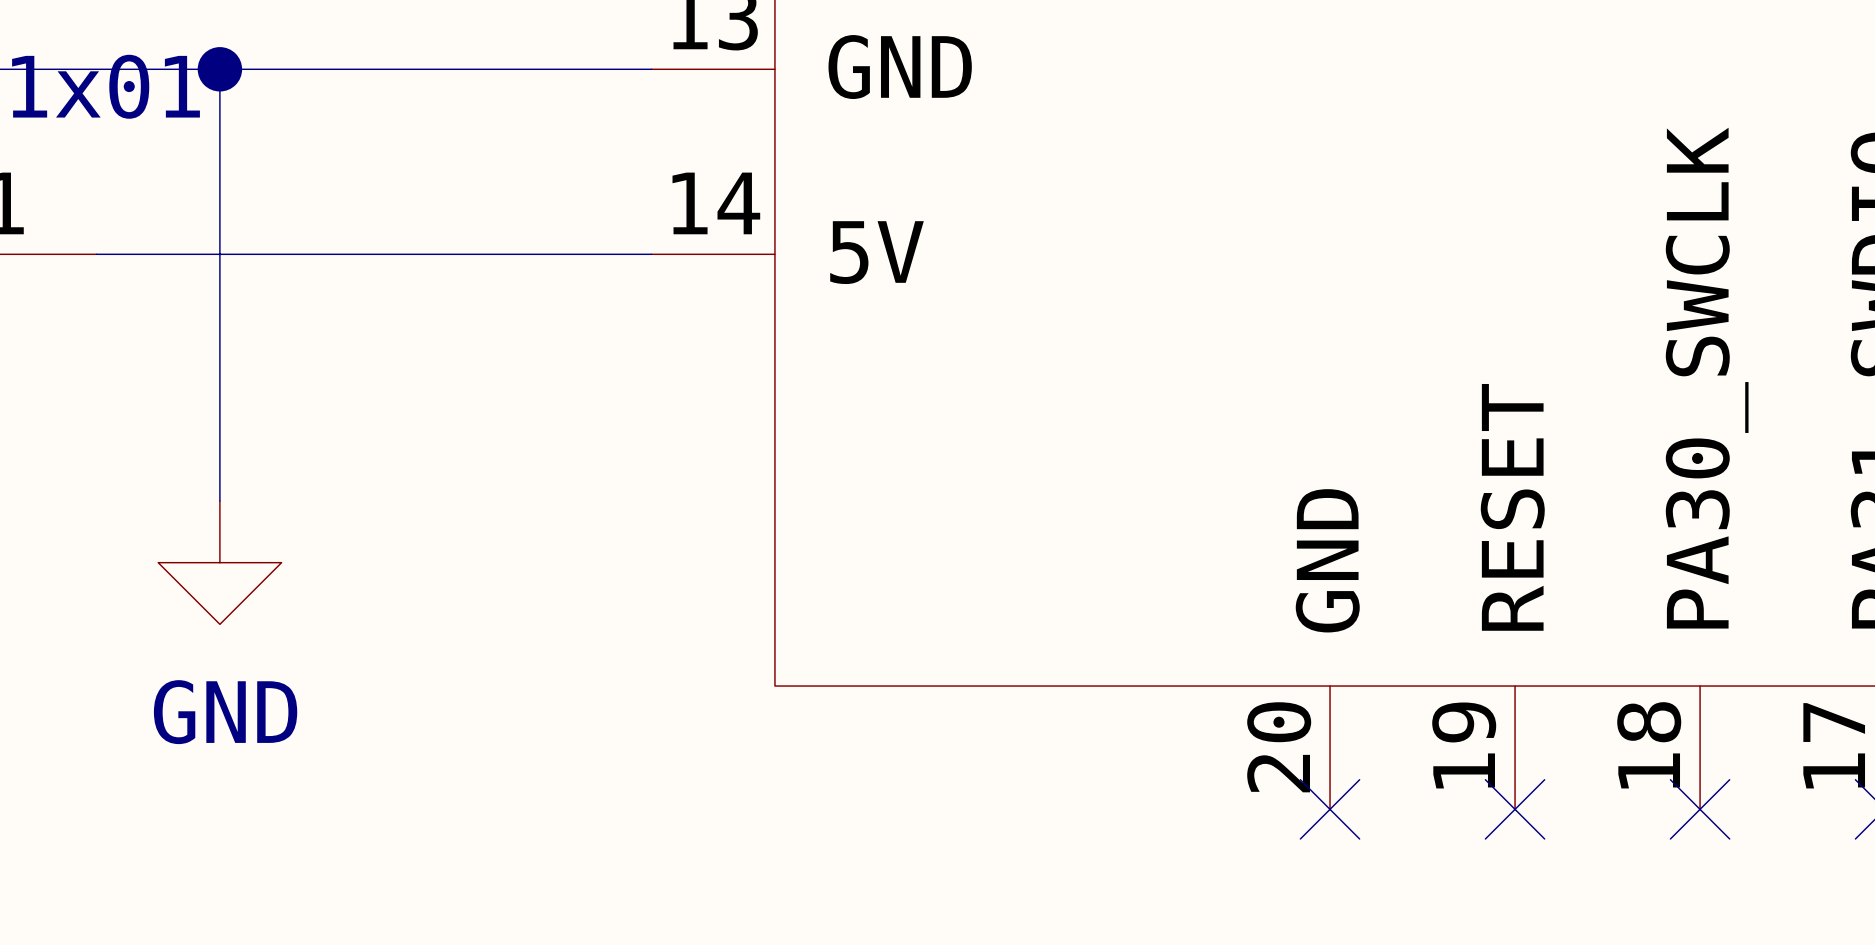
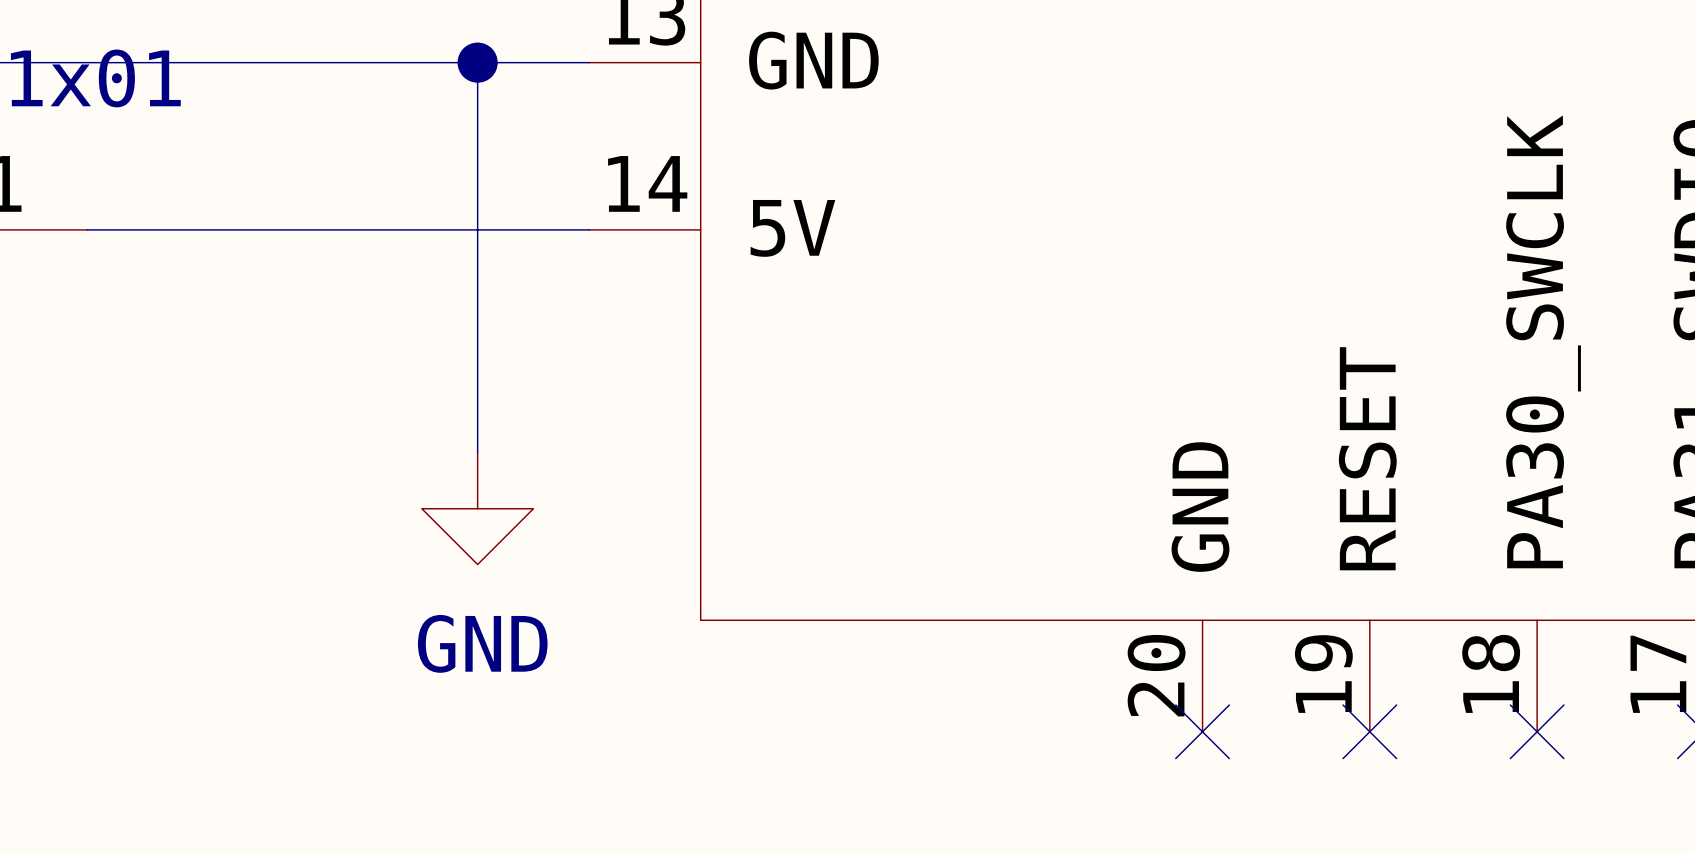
wire: (219, 69) (219, 501) -> (477, 62) (477, 452)
junction: (219, 69) -> none
junction: none -> (477, 62)
power symbol position: GND (219, 562) -> GND (477, 508)

